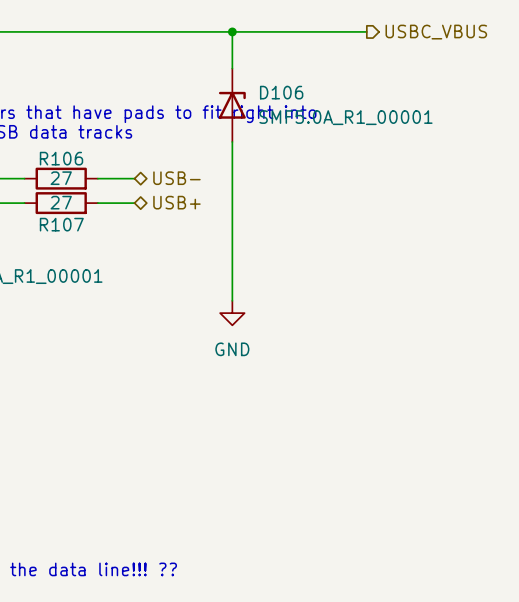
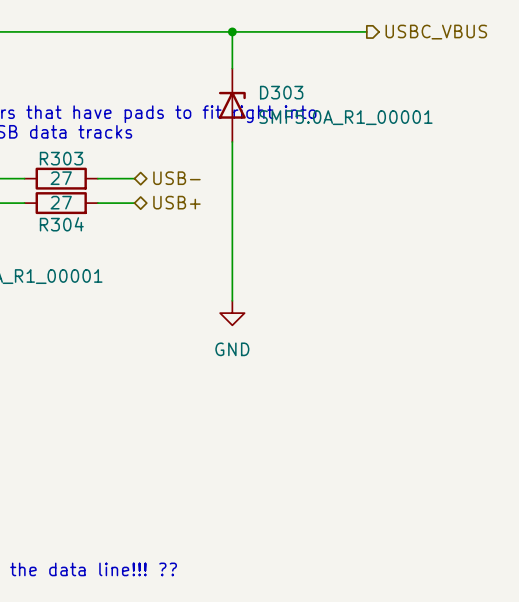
D106 name: D106 (281, 92) -> D303 (281, 92)
R106 name: R106 (61, 158) -> R303 (61, 158)
R107 name: R107 (61, 224) -> R304 (61, 224)

